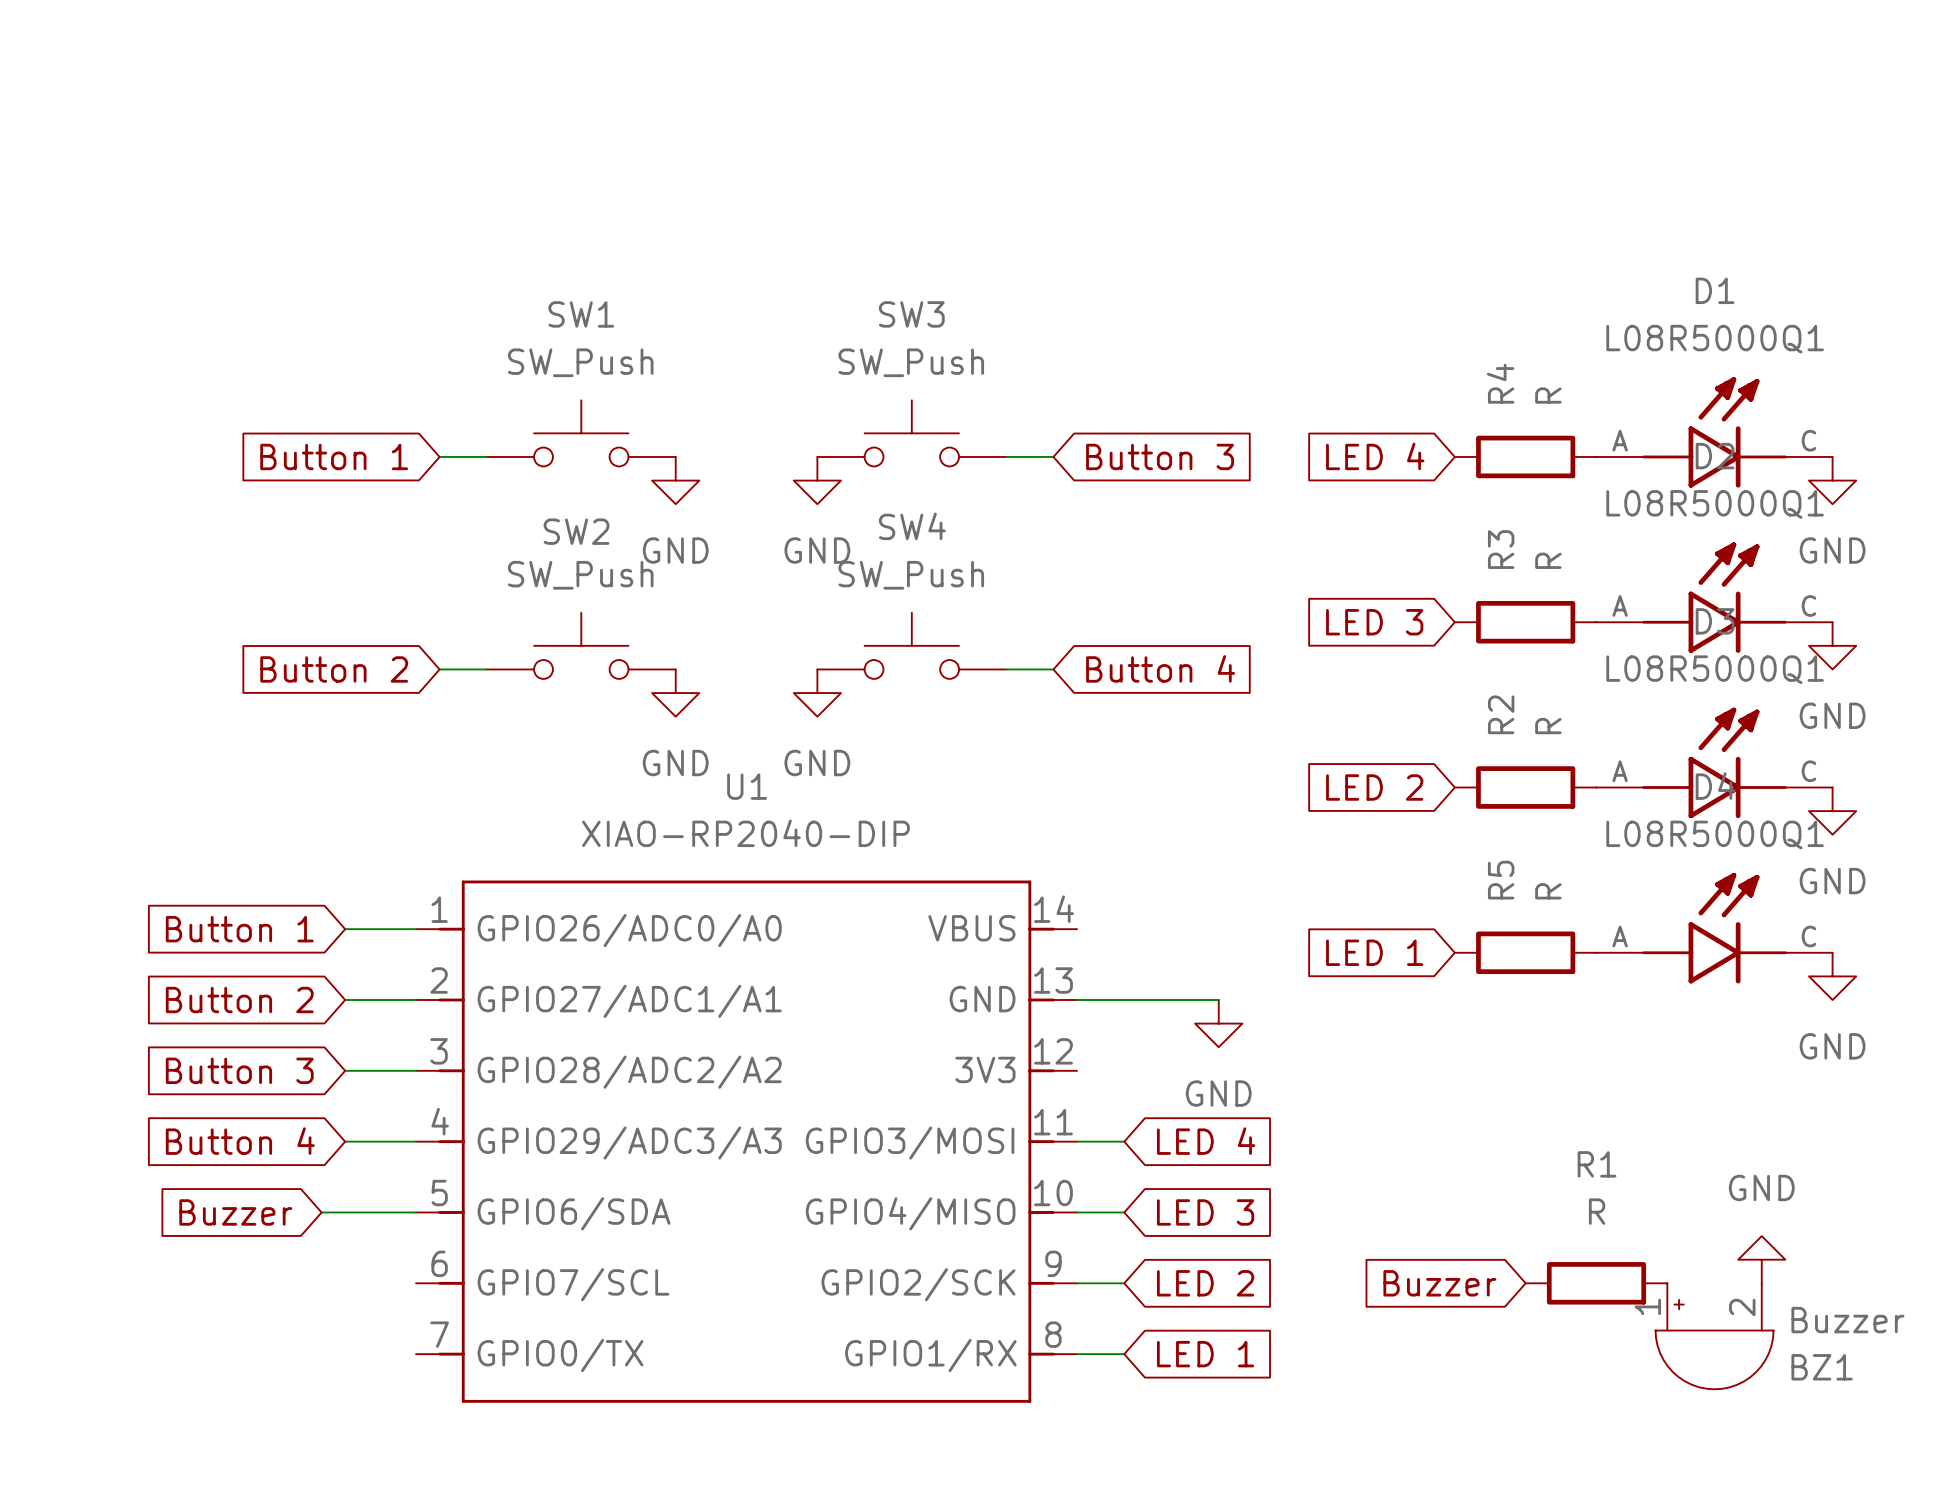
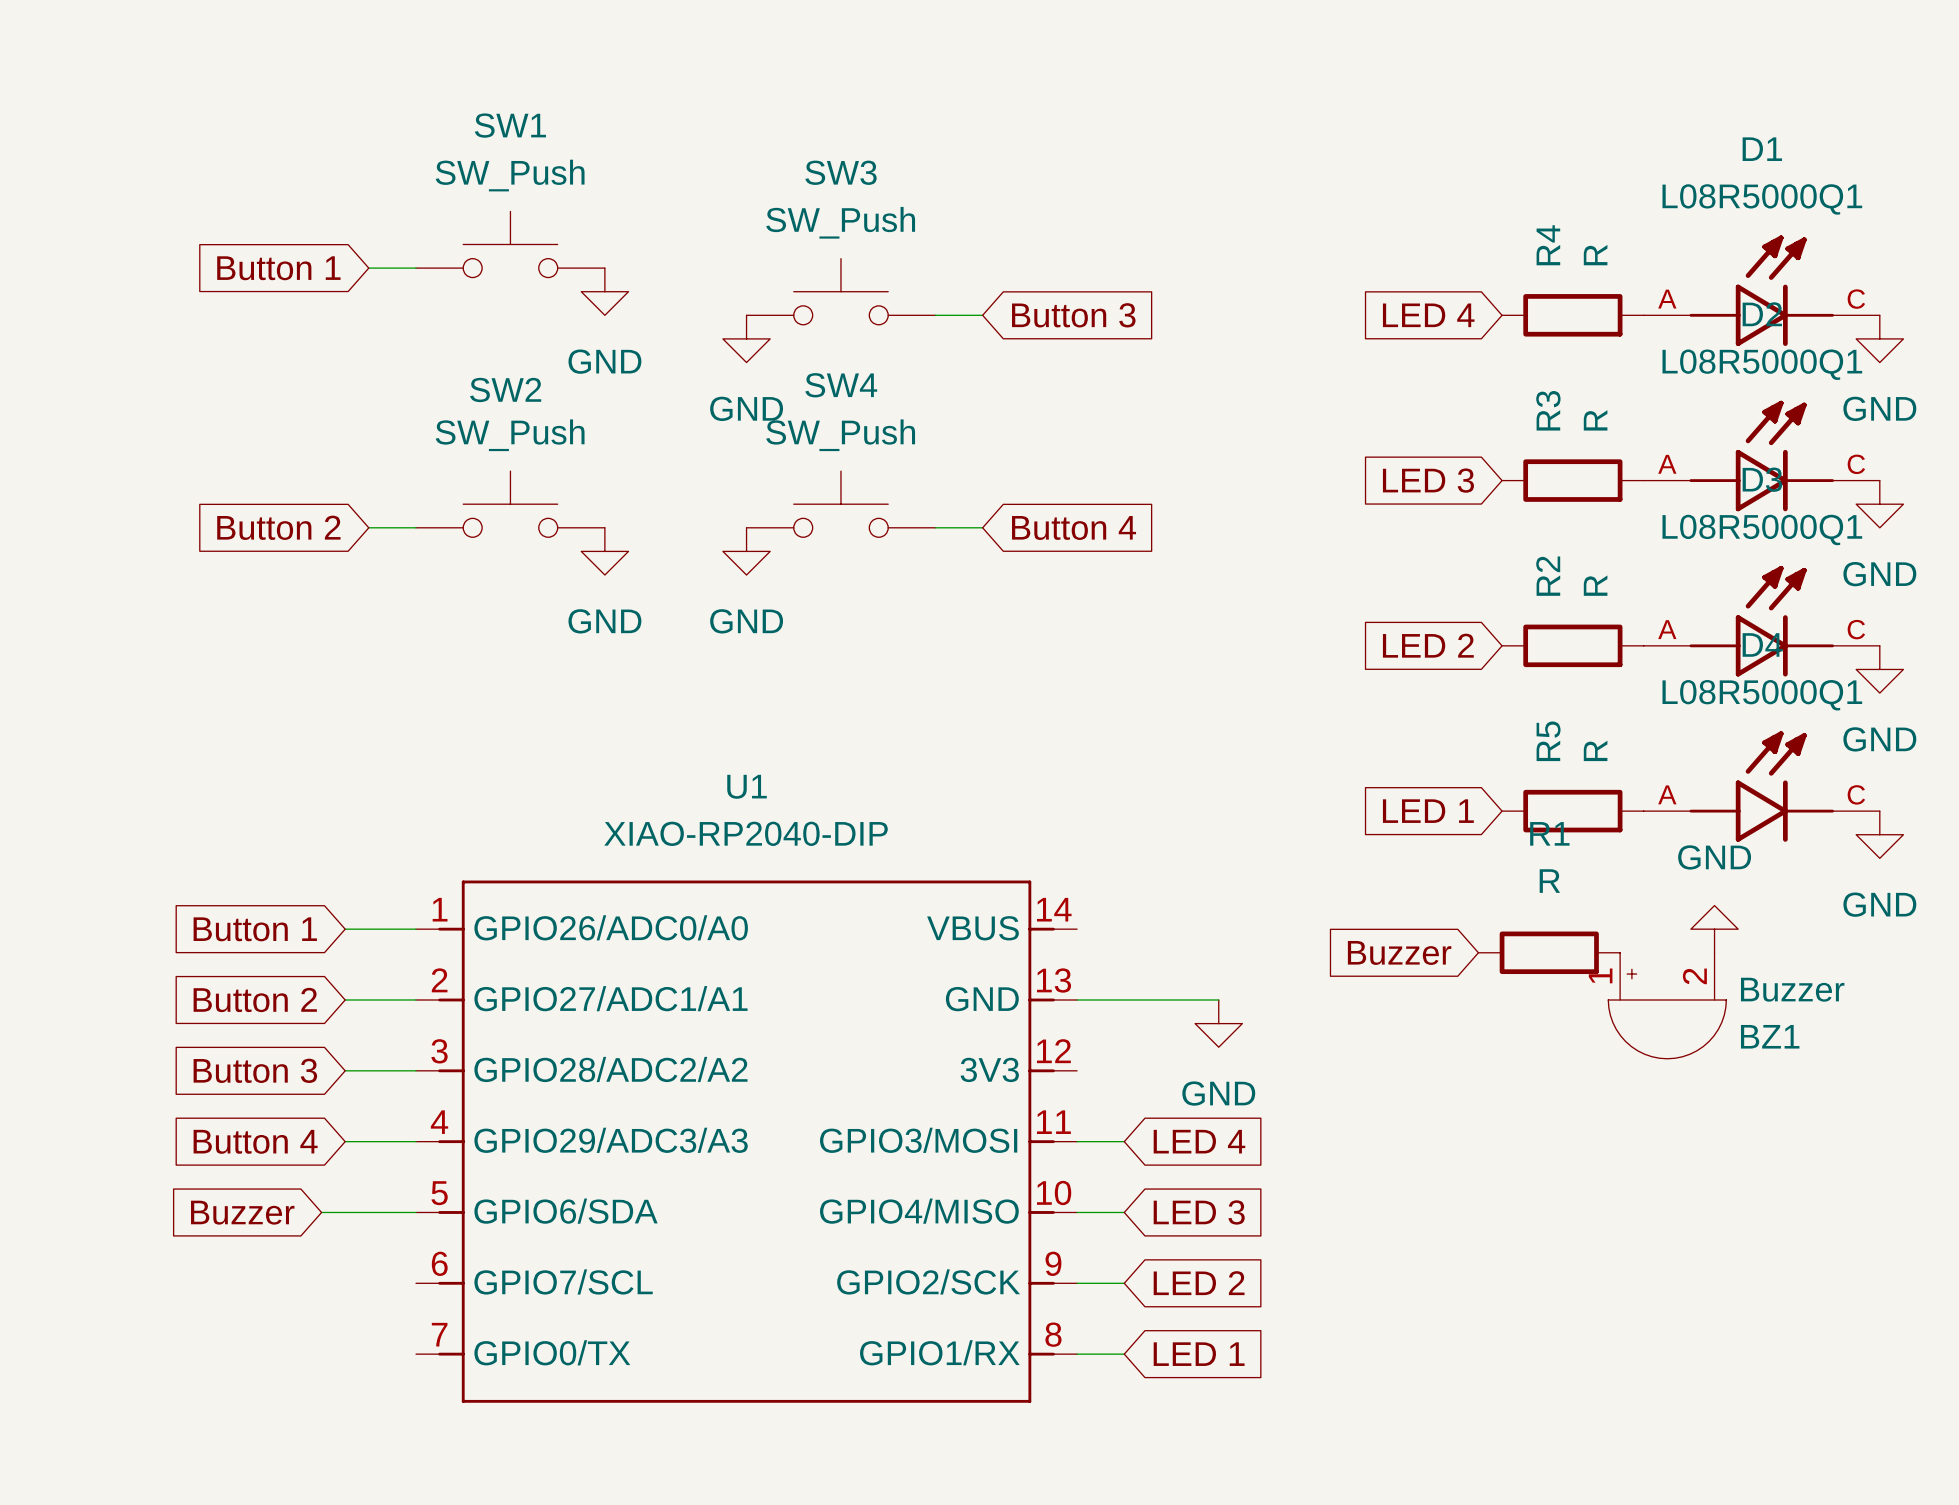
power symbol: none -> GND (604, 291)
power symbol: none -> GND (746, 338)
power symbol: none -> GND (1879, 338)
D1 position: (1714, 432) -> (1761, 290)
SW1 position: (581, 433) -> (510, 244)
SW3 position: (911, 433) -> (840, 291)
global label position: Button 1 (334, 456) -> Button 1 (278, 268)
wire: (439, 456) (486, 456) -> (368, 268) (416, 268)
wire: (1006, 456) (1053, 456) -> (935, 315) (982, 315)
global label position: Button 3 (1160, 456) -> Button 3 (1073, 315)
global label position: LED 4 (1375, 456) -> LED 4 (1428, 315)
R4 position: (1525, 456) -> (1572, 315)
power symbol: GND (675, 480) -> none
power symbol: GND (817, 480) -> none
power symbol position: GND (1832, 480) -> GND (1879, 504)
power symbol: none -> GND (604, 551)
power symbol: none -> GND (746, 551)
D2 position: (1714, 597) -> (1761, 456)
global label position: LED 3 (1374, 622) -> LED 3 (1428, 480)
R3 position: (1525, 622) -> (1572, 480)
SW2 position: (581, 645) -> (510, 504)
SW4 position: (911, 645) -> (840, 504)
power symbol position: GND (1832, 645) -> GND (1879, 669)
global label position: Button 4 (1160, 668) -> Button 4 (1074, 527)
global label position: Button 2 (334, 669) -> Button 2 (278, 527)
wire: (439, 669) (486, 669) -> (368, 527) (416, 527)
wire: (1006, 669) (1053, 669) -> (935, 527) (982, 527)
power symbol: GND (675, 693) -> none
power symbol: GND (817, 693) -> none
D3 position: (1714, 762) -> (1761, 621)
global label position: LED 2 (1374, 787) -> LED 2 (1428, 645)
R2 position: (1525, 787) -> (1572, 645)
power symbol position: GND (1832, 811) -> GND (1879, 834)
D4 position: (1714, 928) -> (1761, 786)
power symbol: none -> GND (1714, 929)
global label position: LED 1 (1374, 952) -> LED 1 (1428, 811)
R5 position: (1525, 952) -> (1572, 811)
power symbol: GND (1832, 976) -> none
power symbol: GND (1761, 1259) -> none
global label position: Buzzer (1439, 1283) -> Buzzer (1399, 952)
R1 position: (1596, 1283) -> (1549, 952)
BZ1 position: (1714, 1336) -> (1667, 1005)

